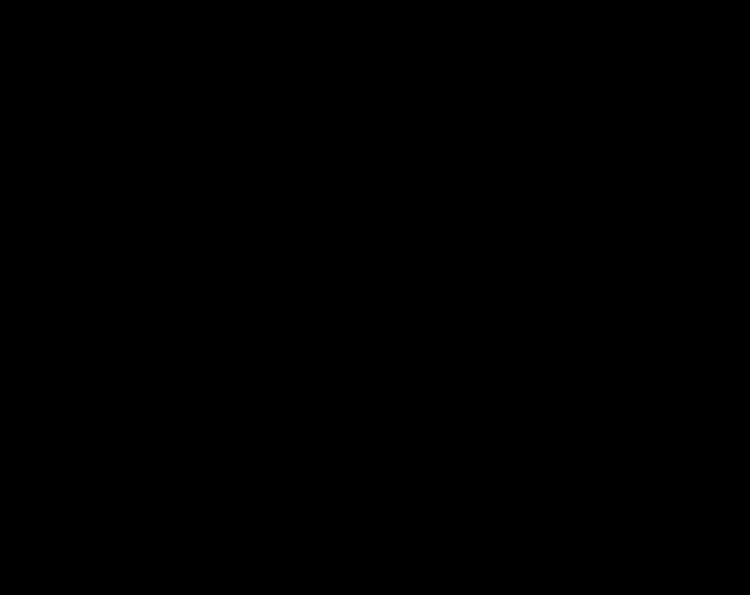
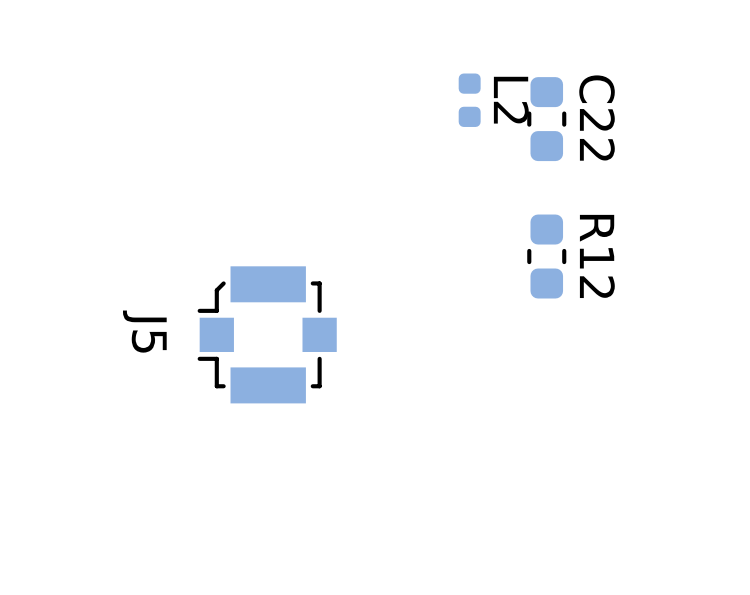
L2: none -> (469, 100)
C22: none -> (546, 119)
R12: none -> (546, 256)
J5: none -> (267, 334)

